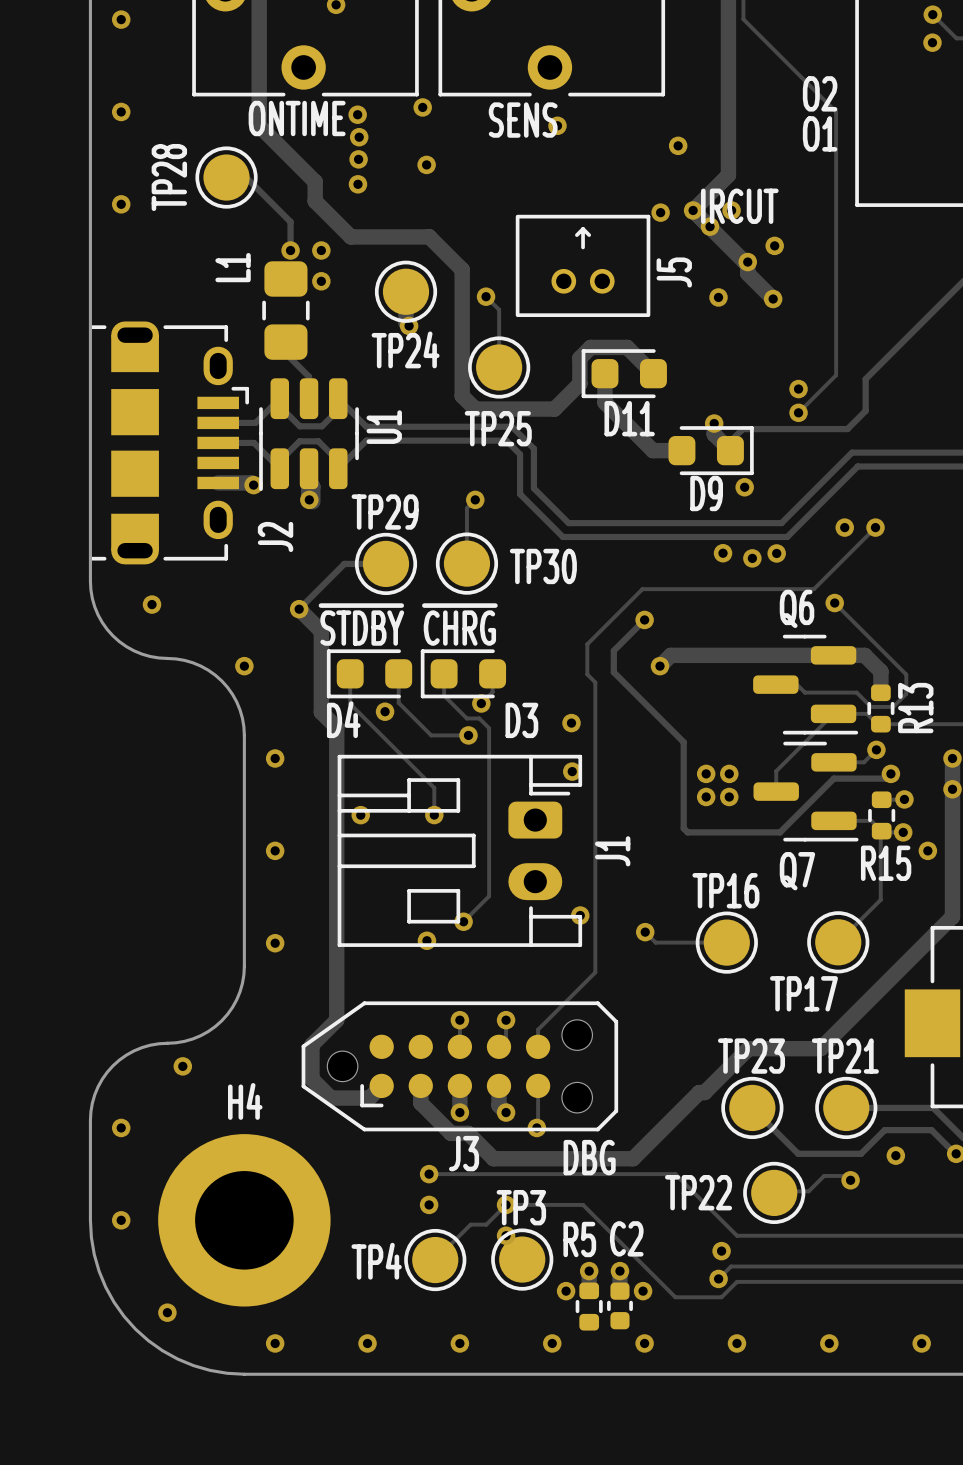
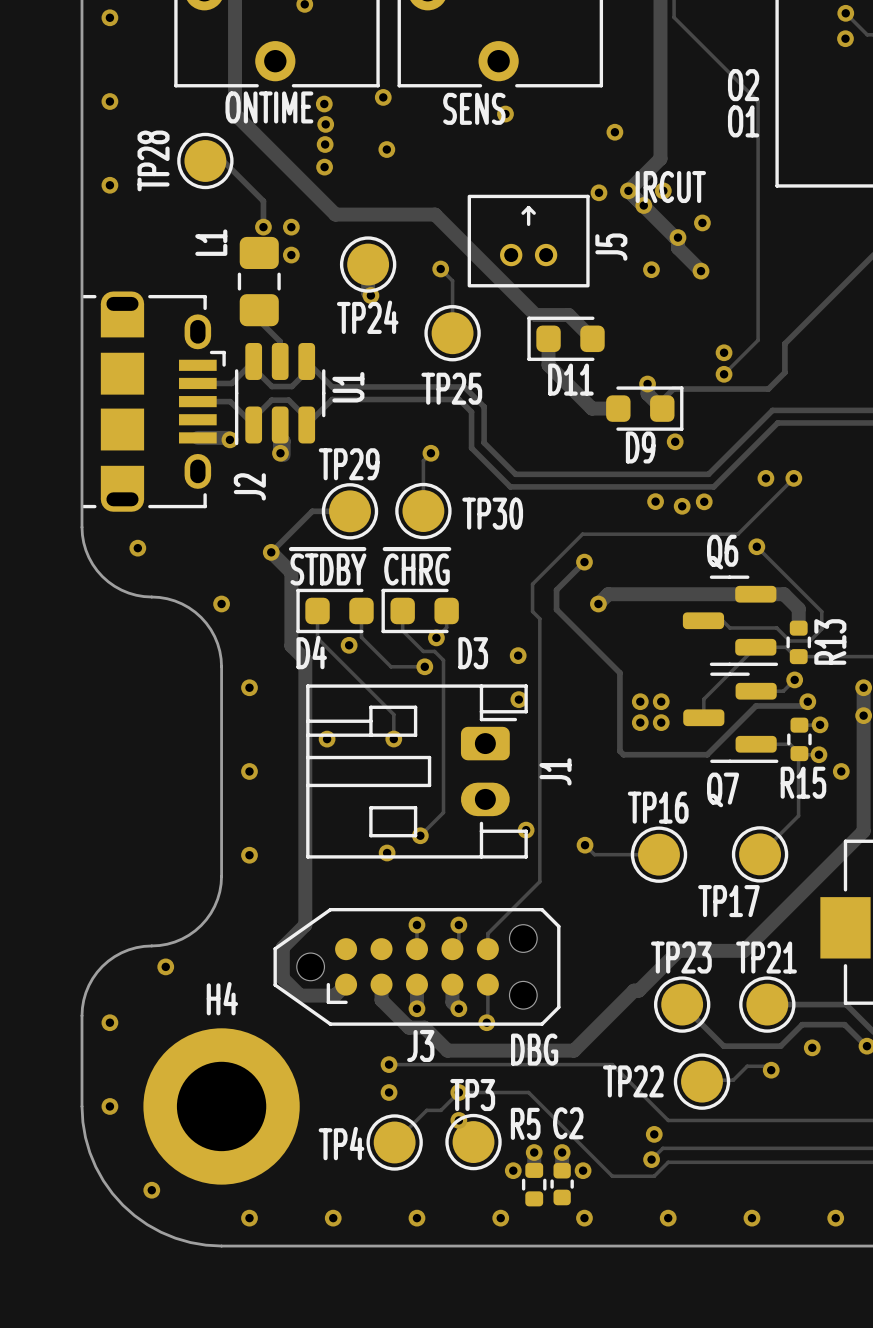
track: (315, 181) (315, 201) (350, 236) (428, 236) -> none
track: (429, 236) (462, 269) (462, 395) (475, 409) (554, 409) (579, 383) (579, 358) (590, 347) -> (285, 164) (335, 214) (435, 214) (535, 315)

